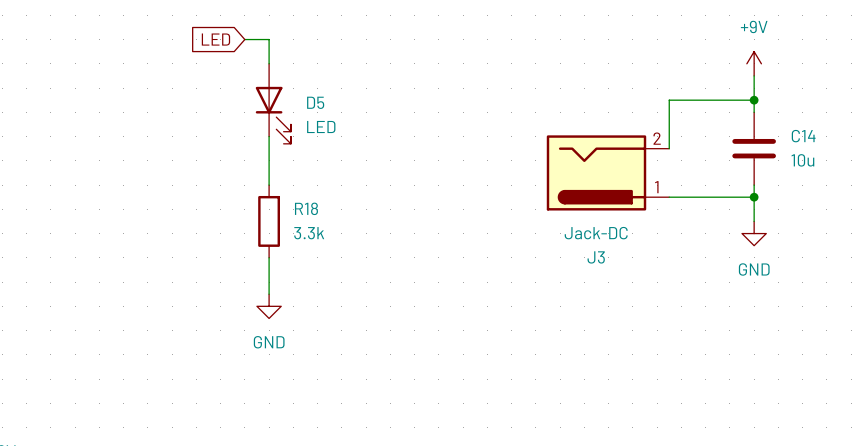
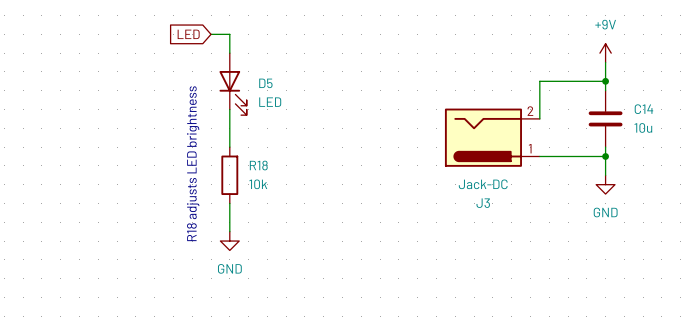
text: none -> R18 adjusts LED brightness (193, 163)
R18 value: 3.3k (309, 233) -> 10k (258, 184)

